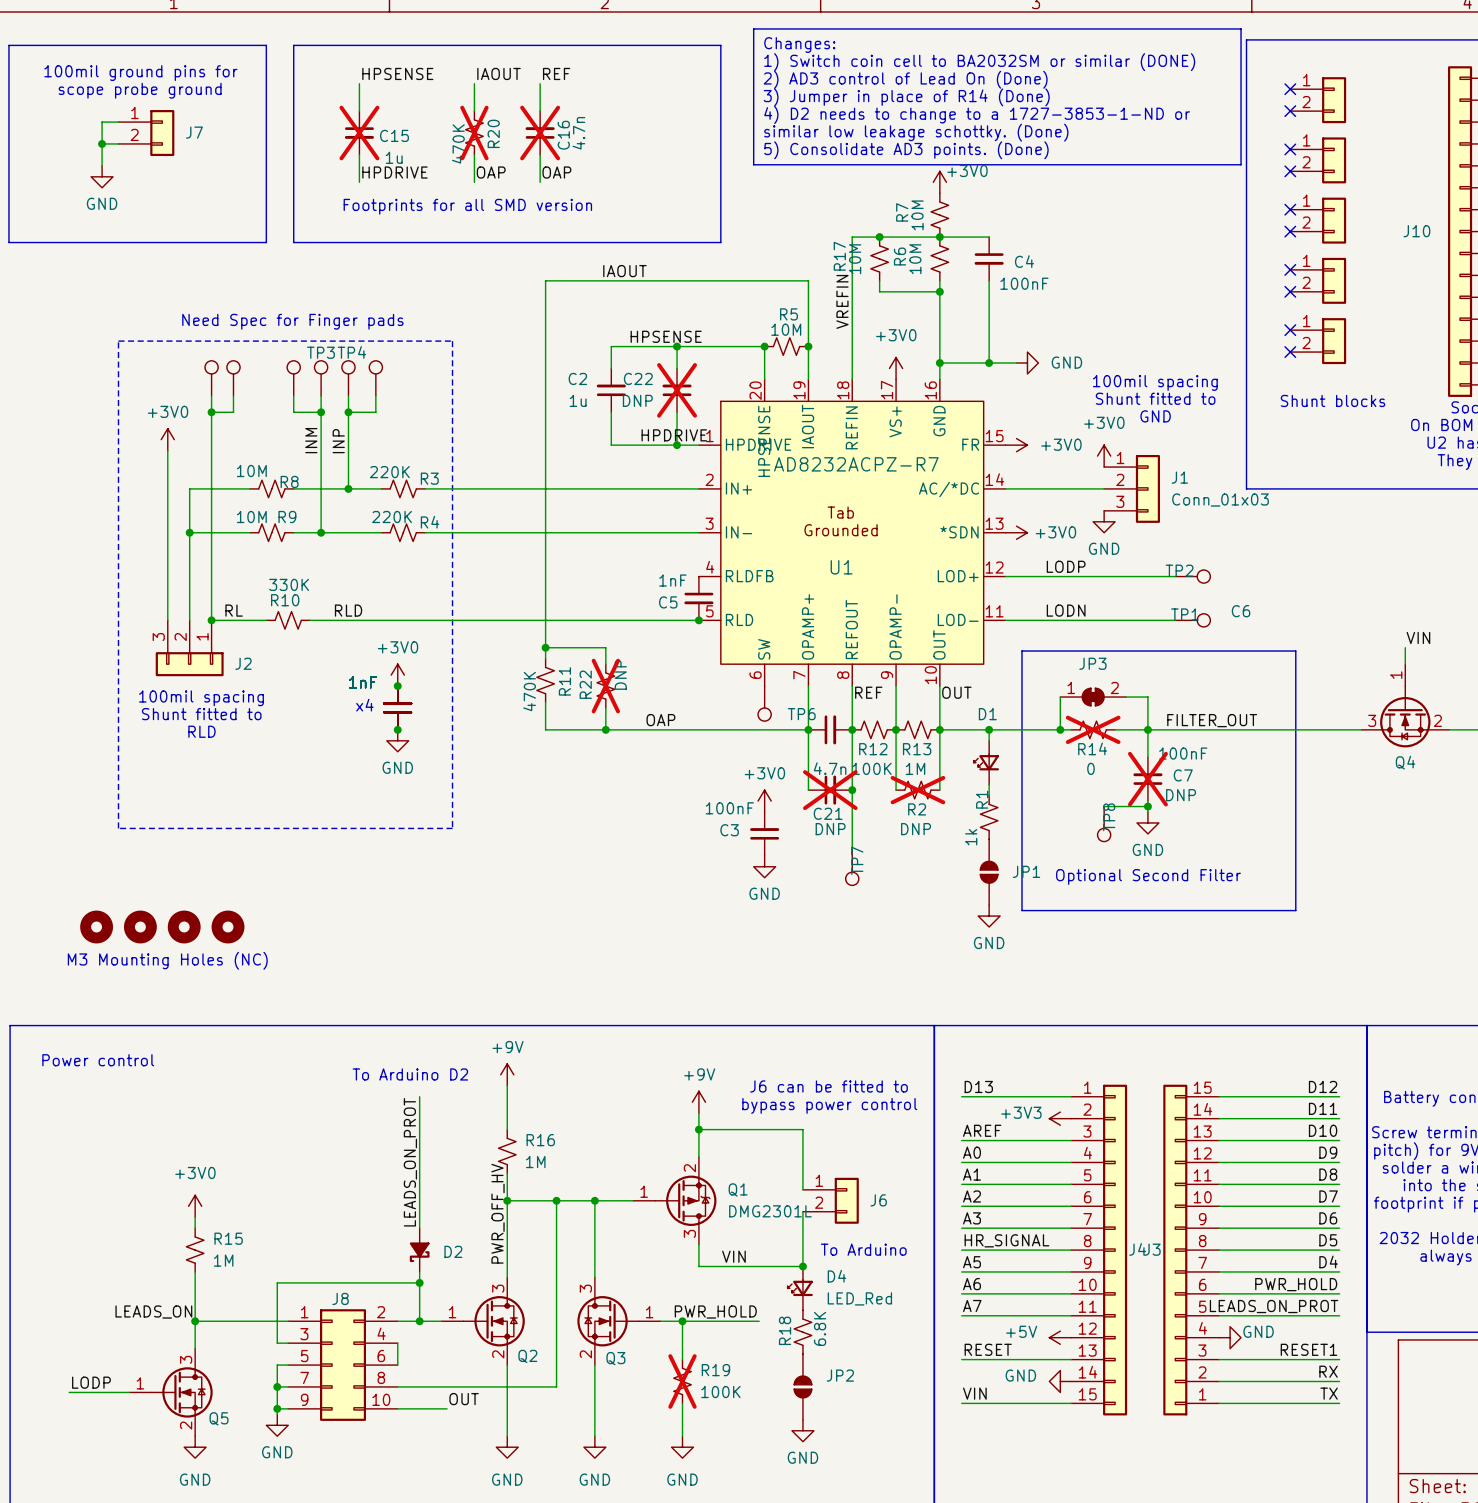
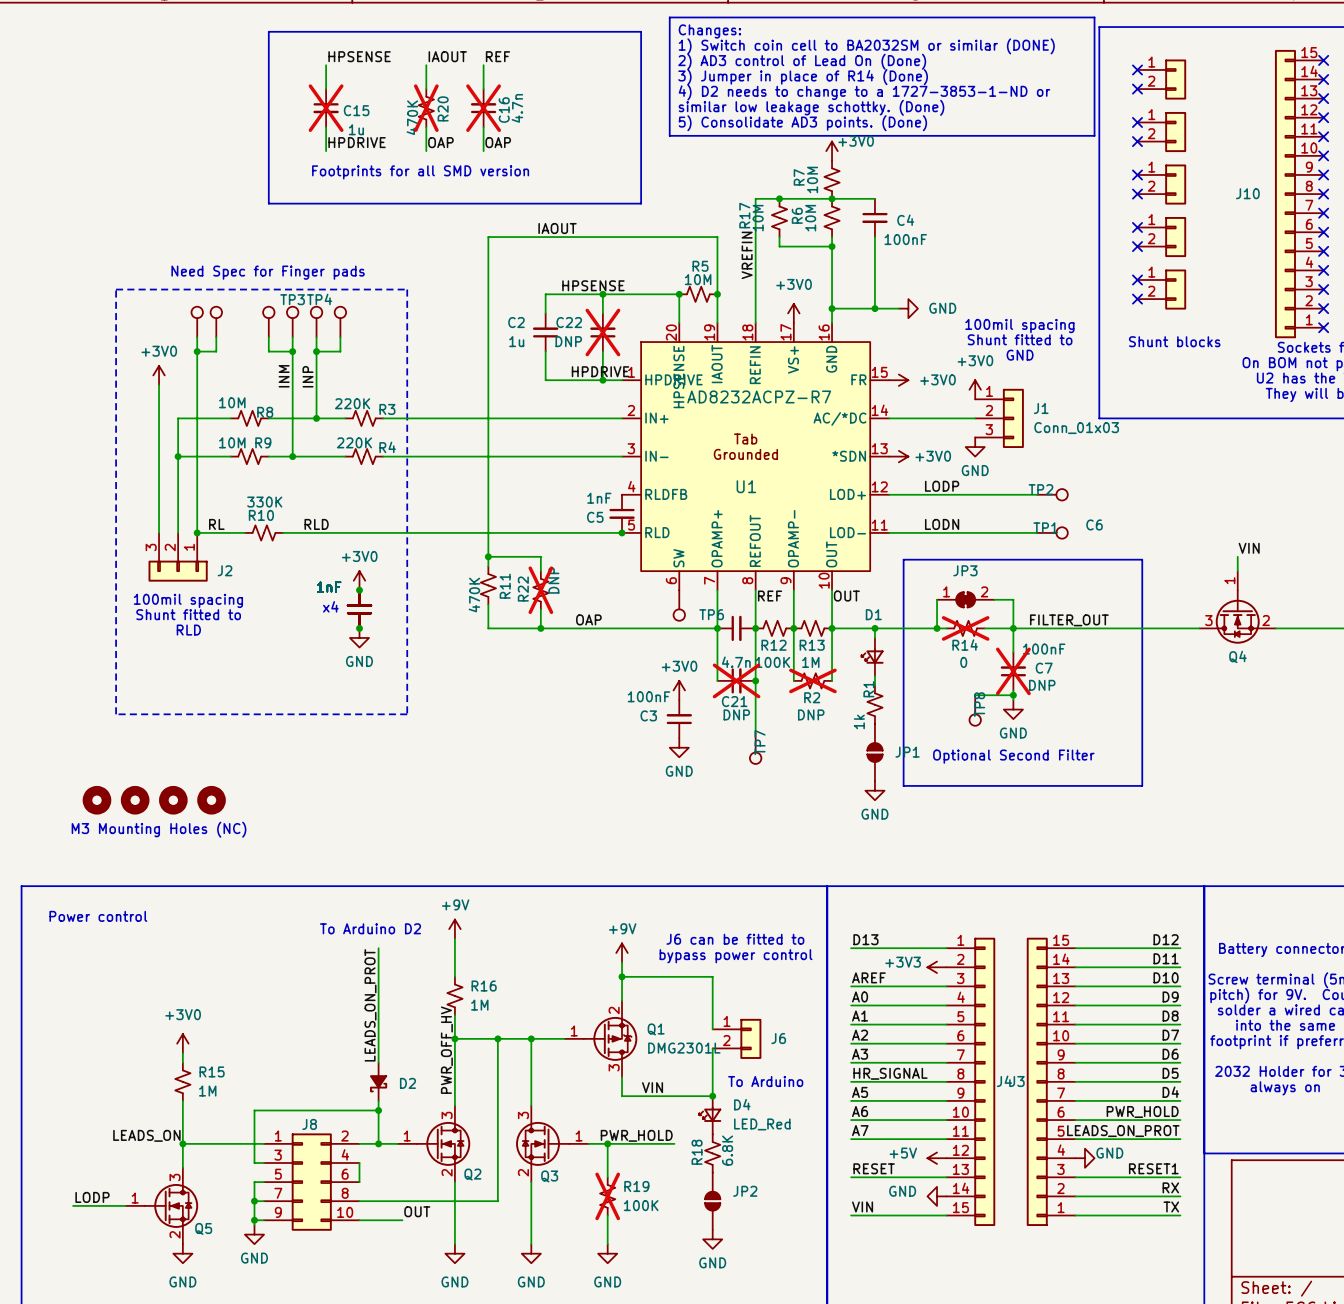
line: (8, 45) (266, 45) (266, 242) (8, 242) (8, 45) -> none
text: 100mil ground pins for (140, 73) -> none
text: scope probe ground (140, 90) -> none
wire: (118, 122) (102, 122) (102, 165) -> none
J7: (146, 133) -> none
wire: (102, 143) (118, 143) -> none
junction: (102, 143) -> none
power symbol: GND (102, 176) -> none

